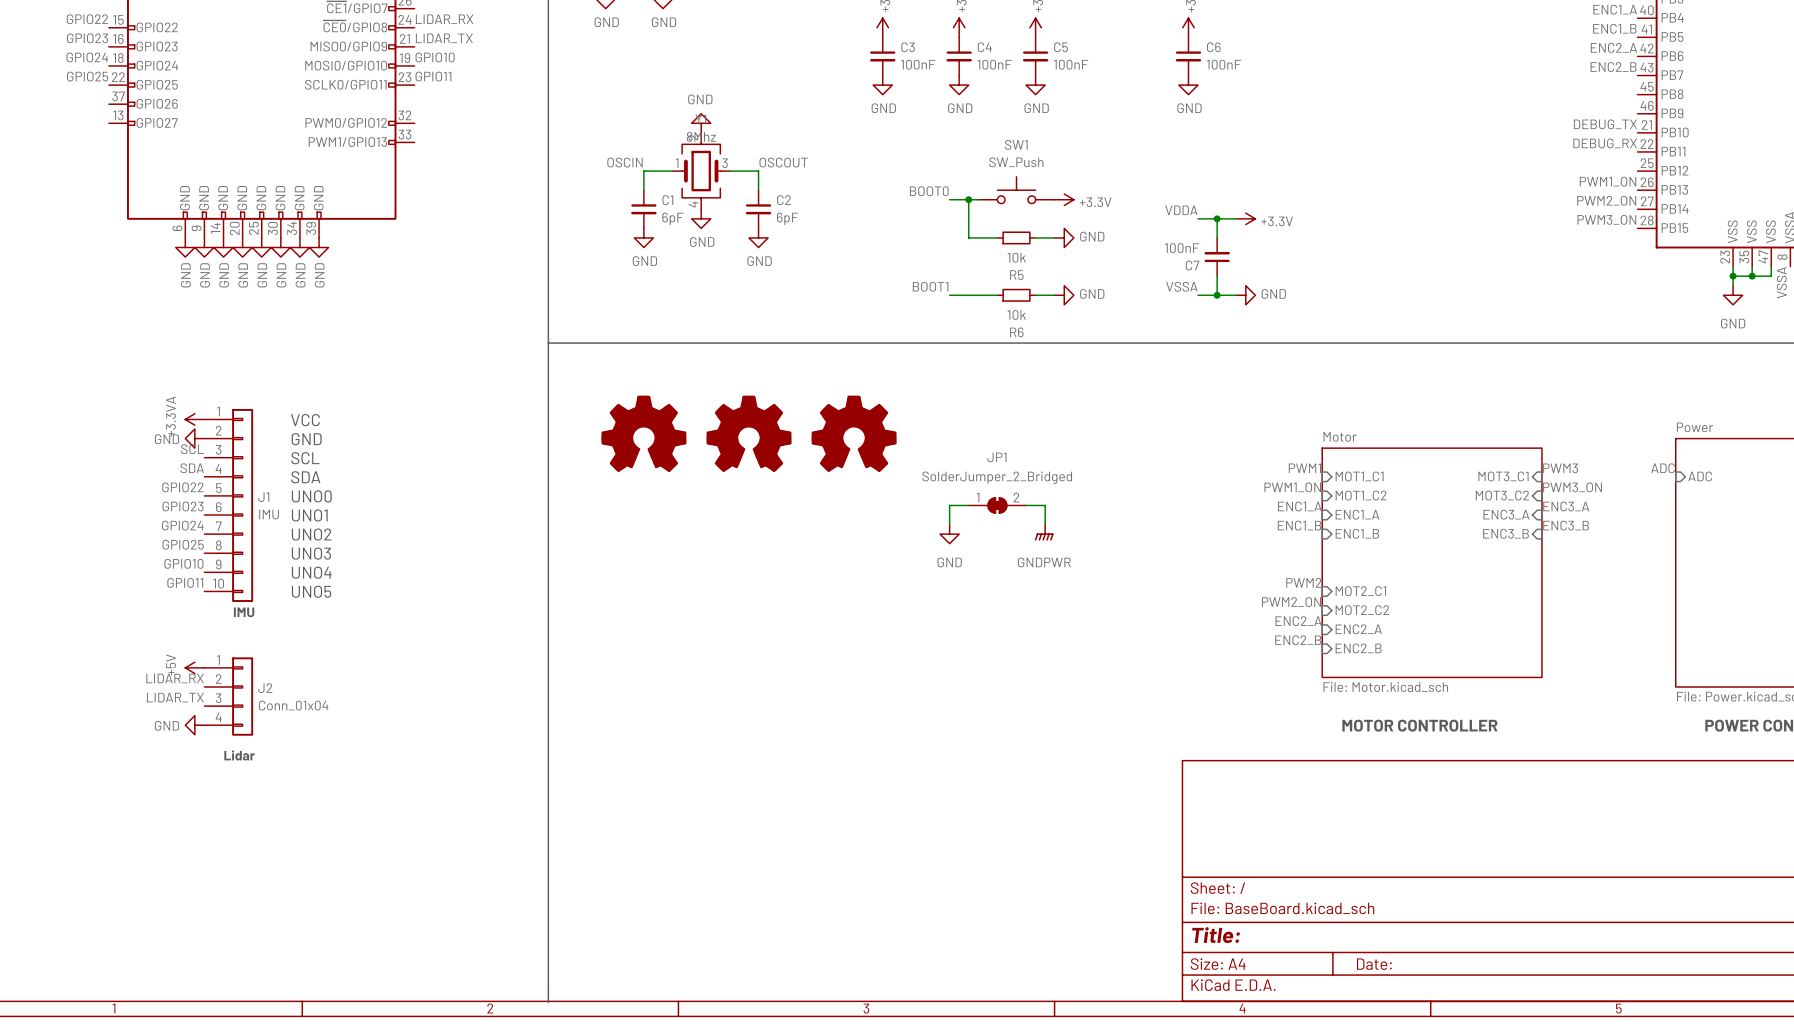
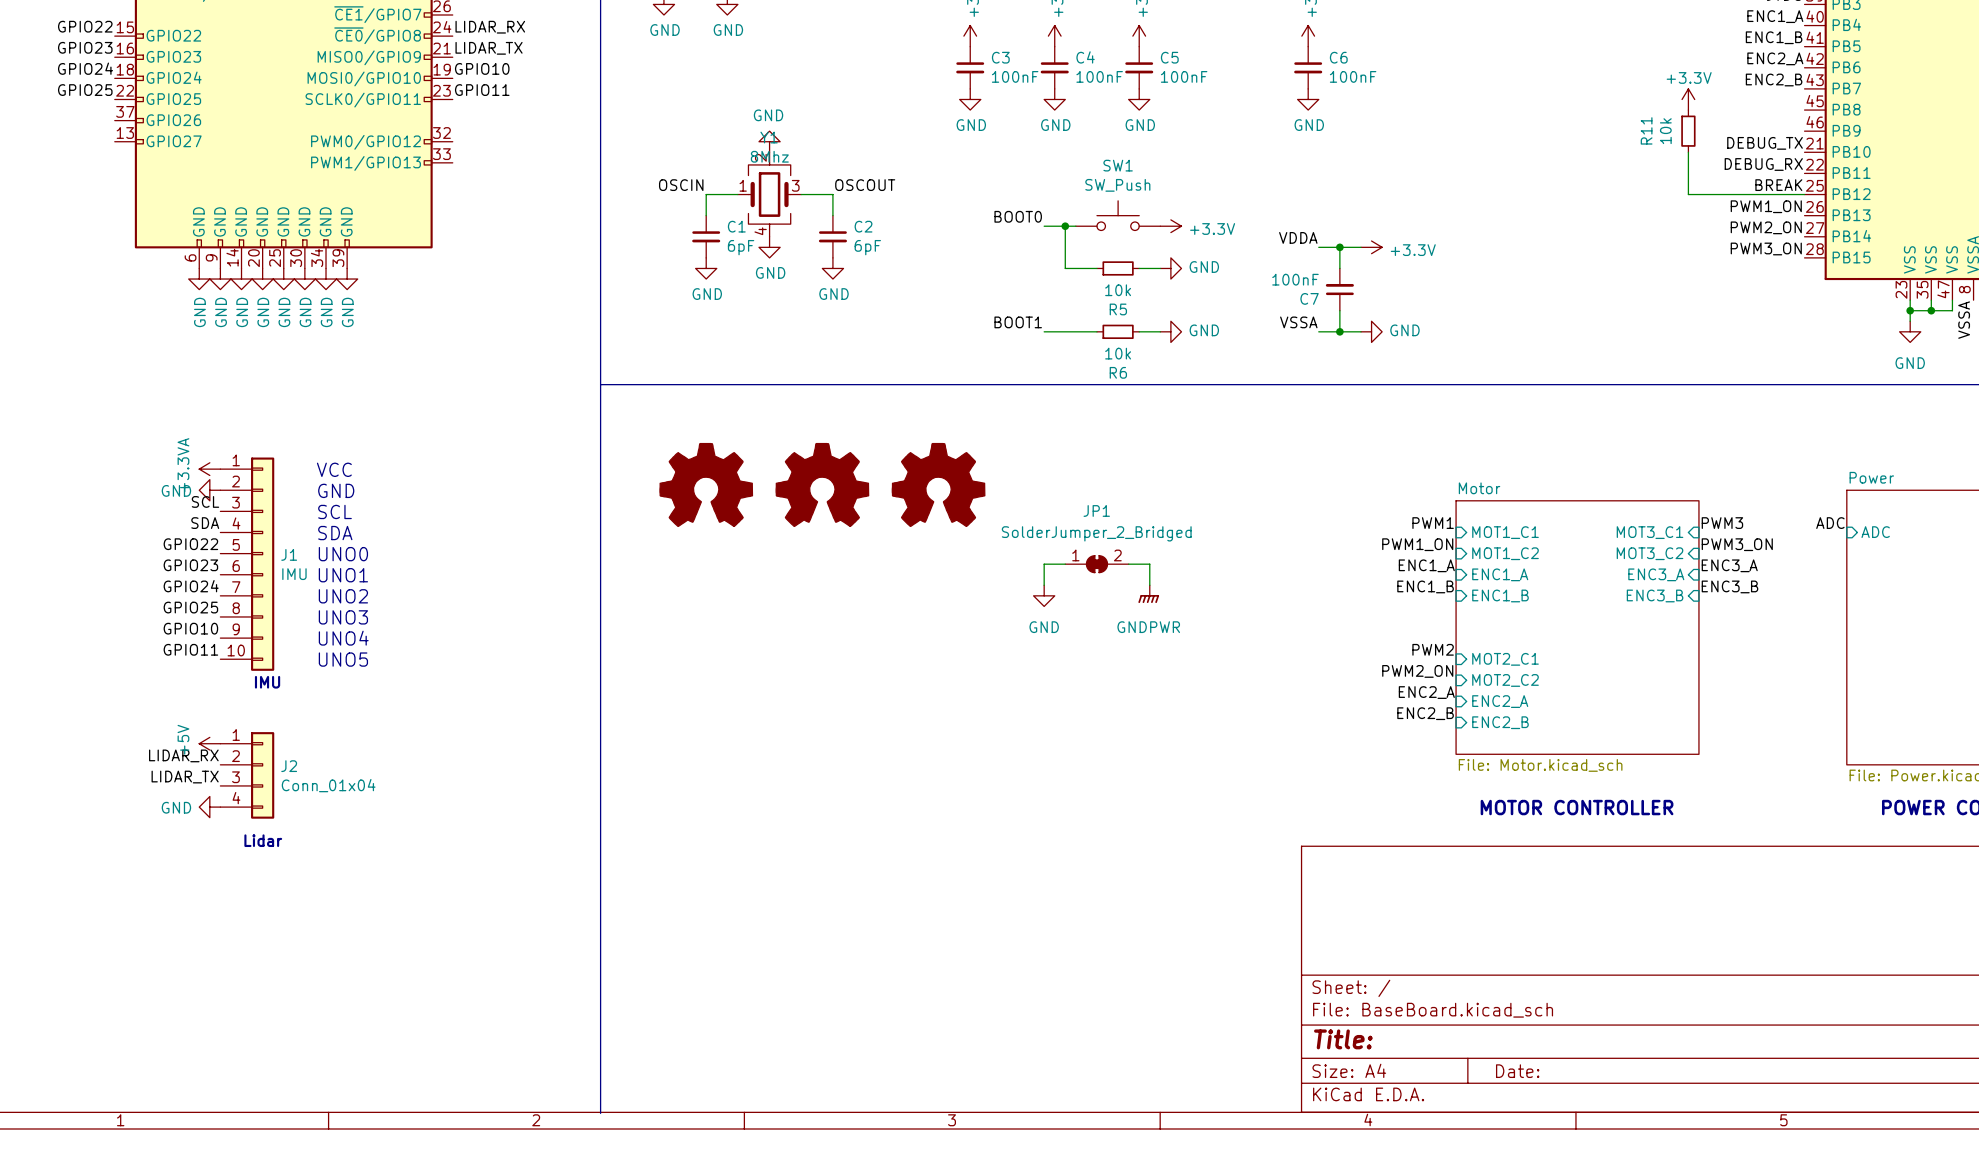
power symbol: none -> +3.3V (1688, 99)
R11: none -> 10k (1688, 131)
wire: none -> (1688, 152) (1688, 194) (1804, 194)
label: none -> BREAK (1778, 185)

